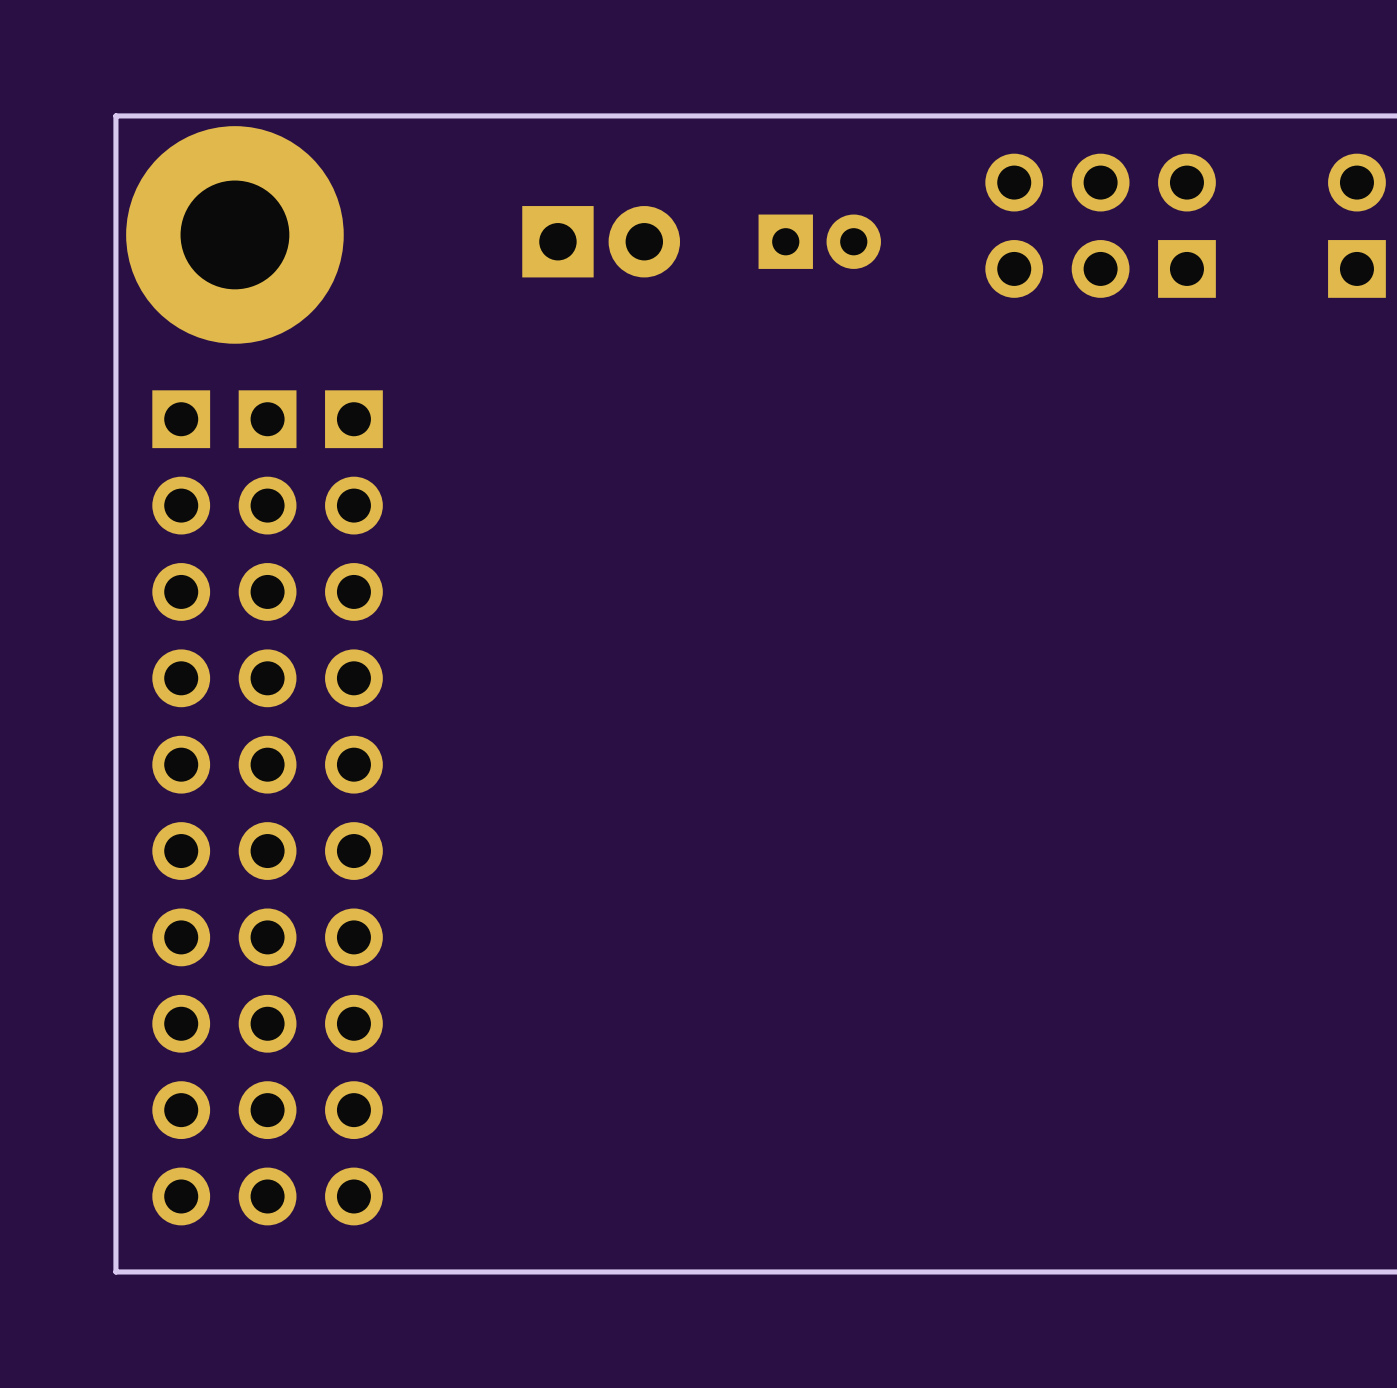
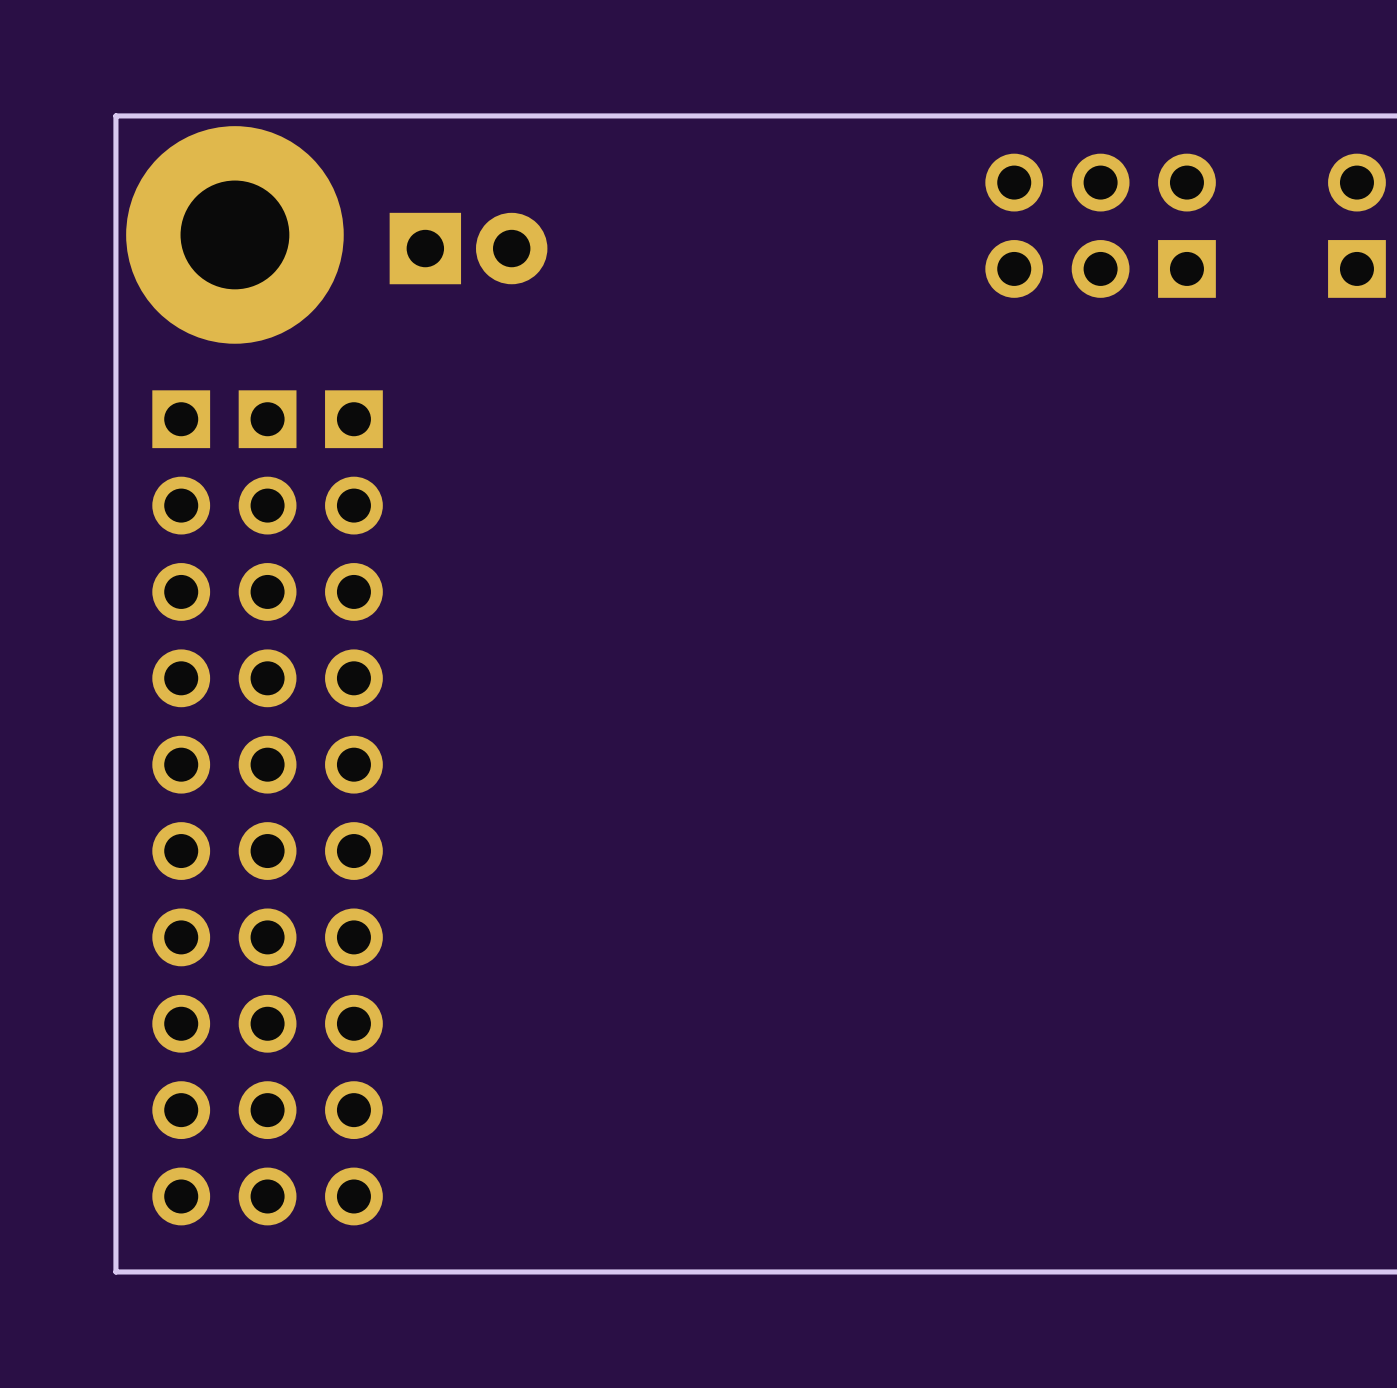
part position: (601, 241) -> (468, 248)
part: (819, 241) -> none

